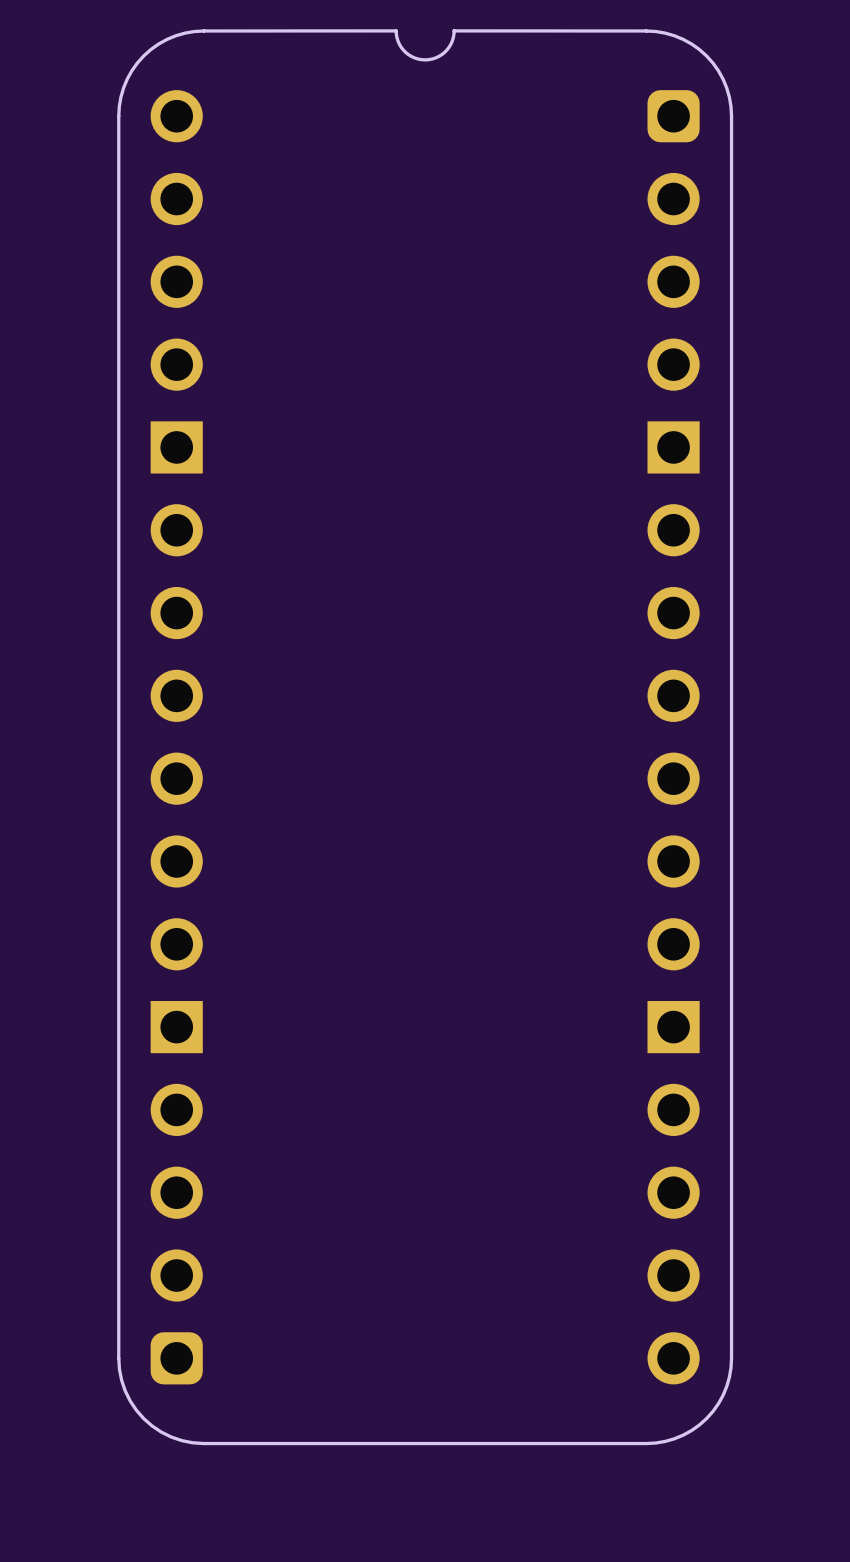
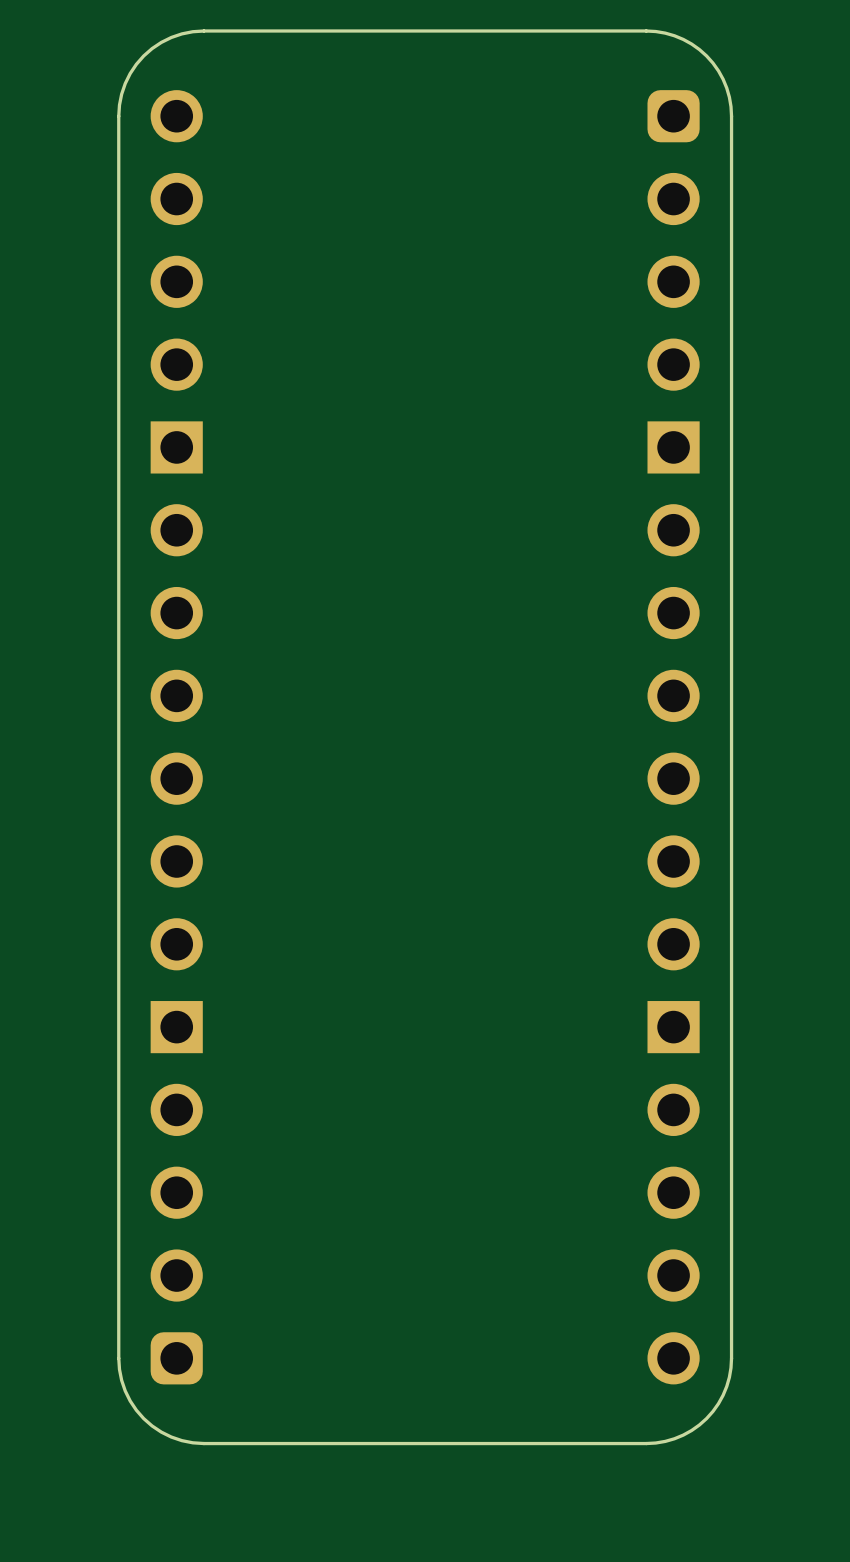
part footprint: [117, 29, 734, 1446] -> [117, 29, 734, 1446]

